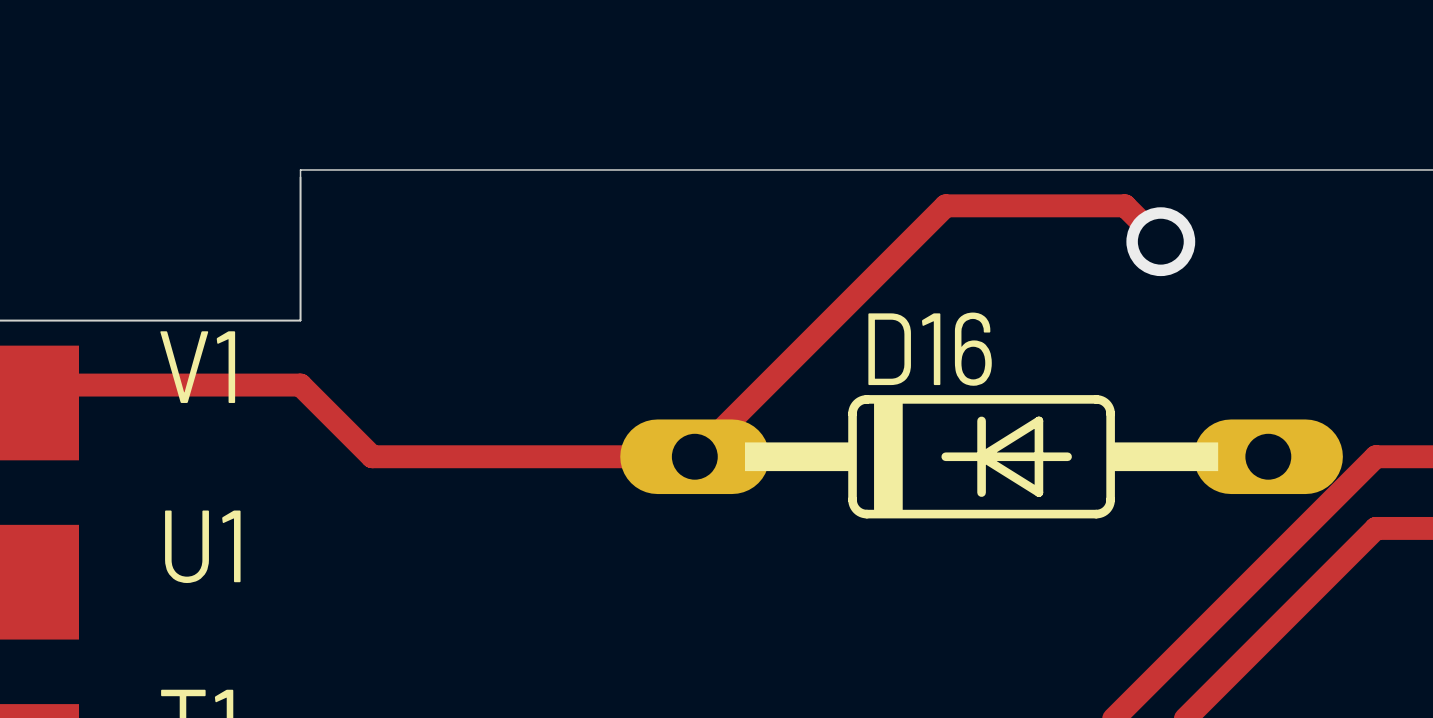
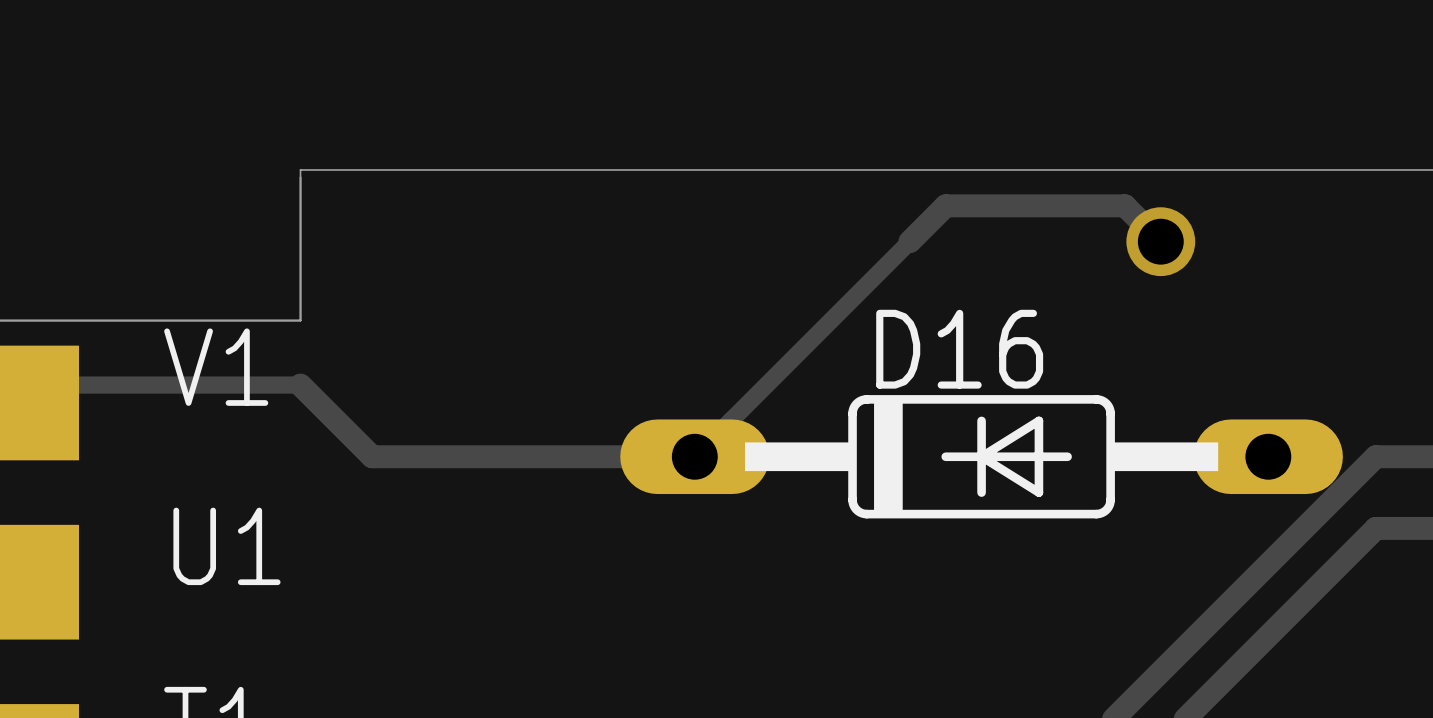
track width: thick (909, 241) (694, 456) (623, 456) -> thin (909, 241) (694, 456) (623, 456)
track width: thick (49, 385) (300, 385) -> thin (49, 385) (300, 385)

